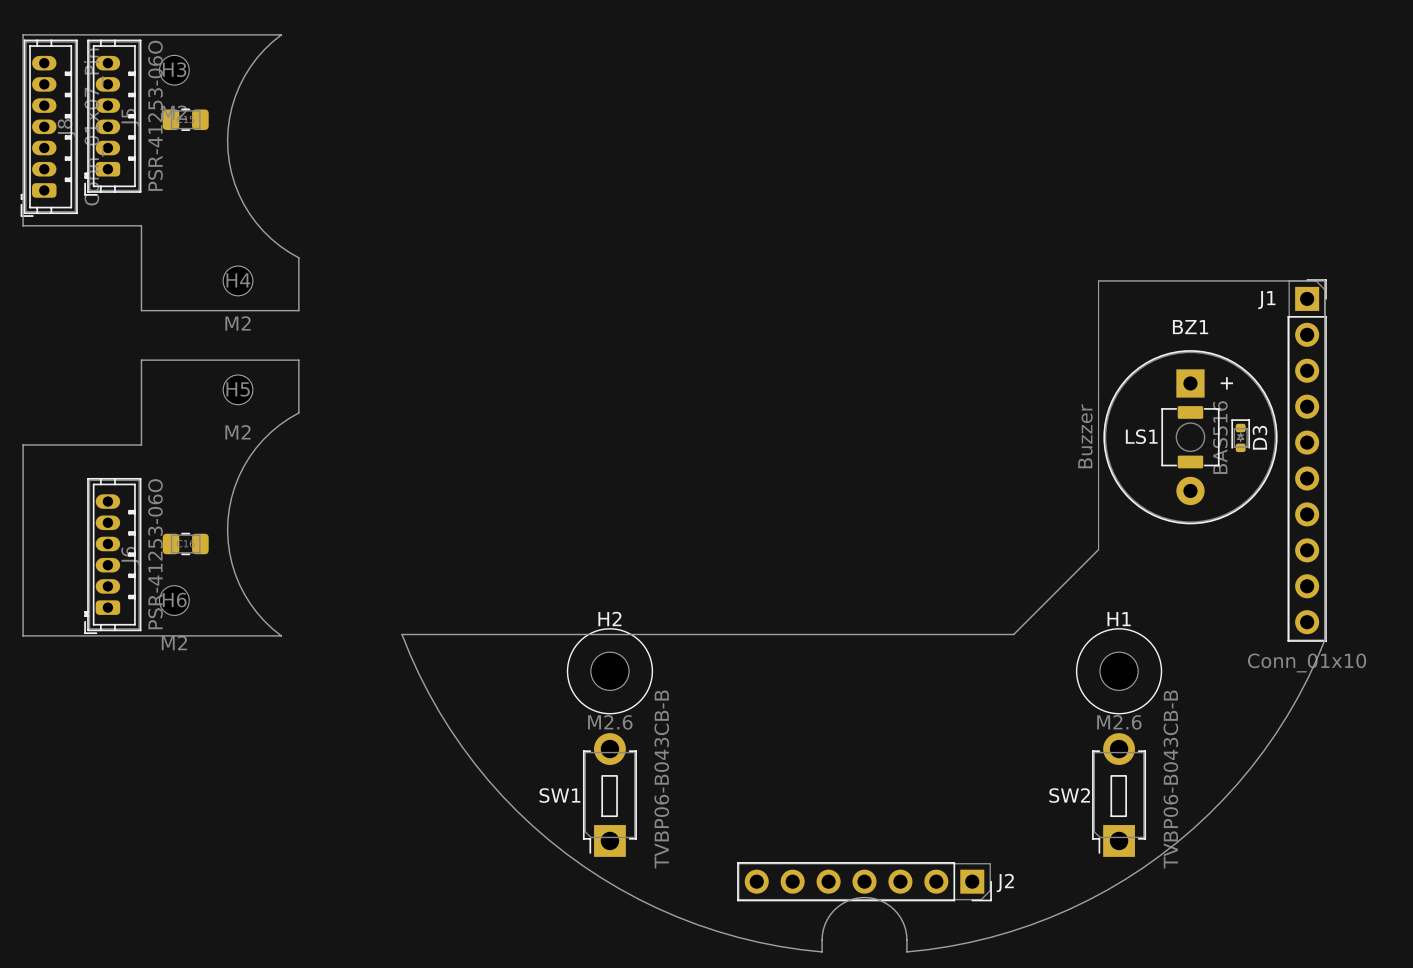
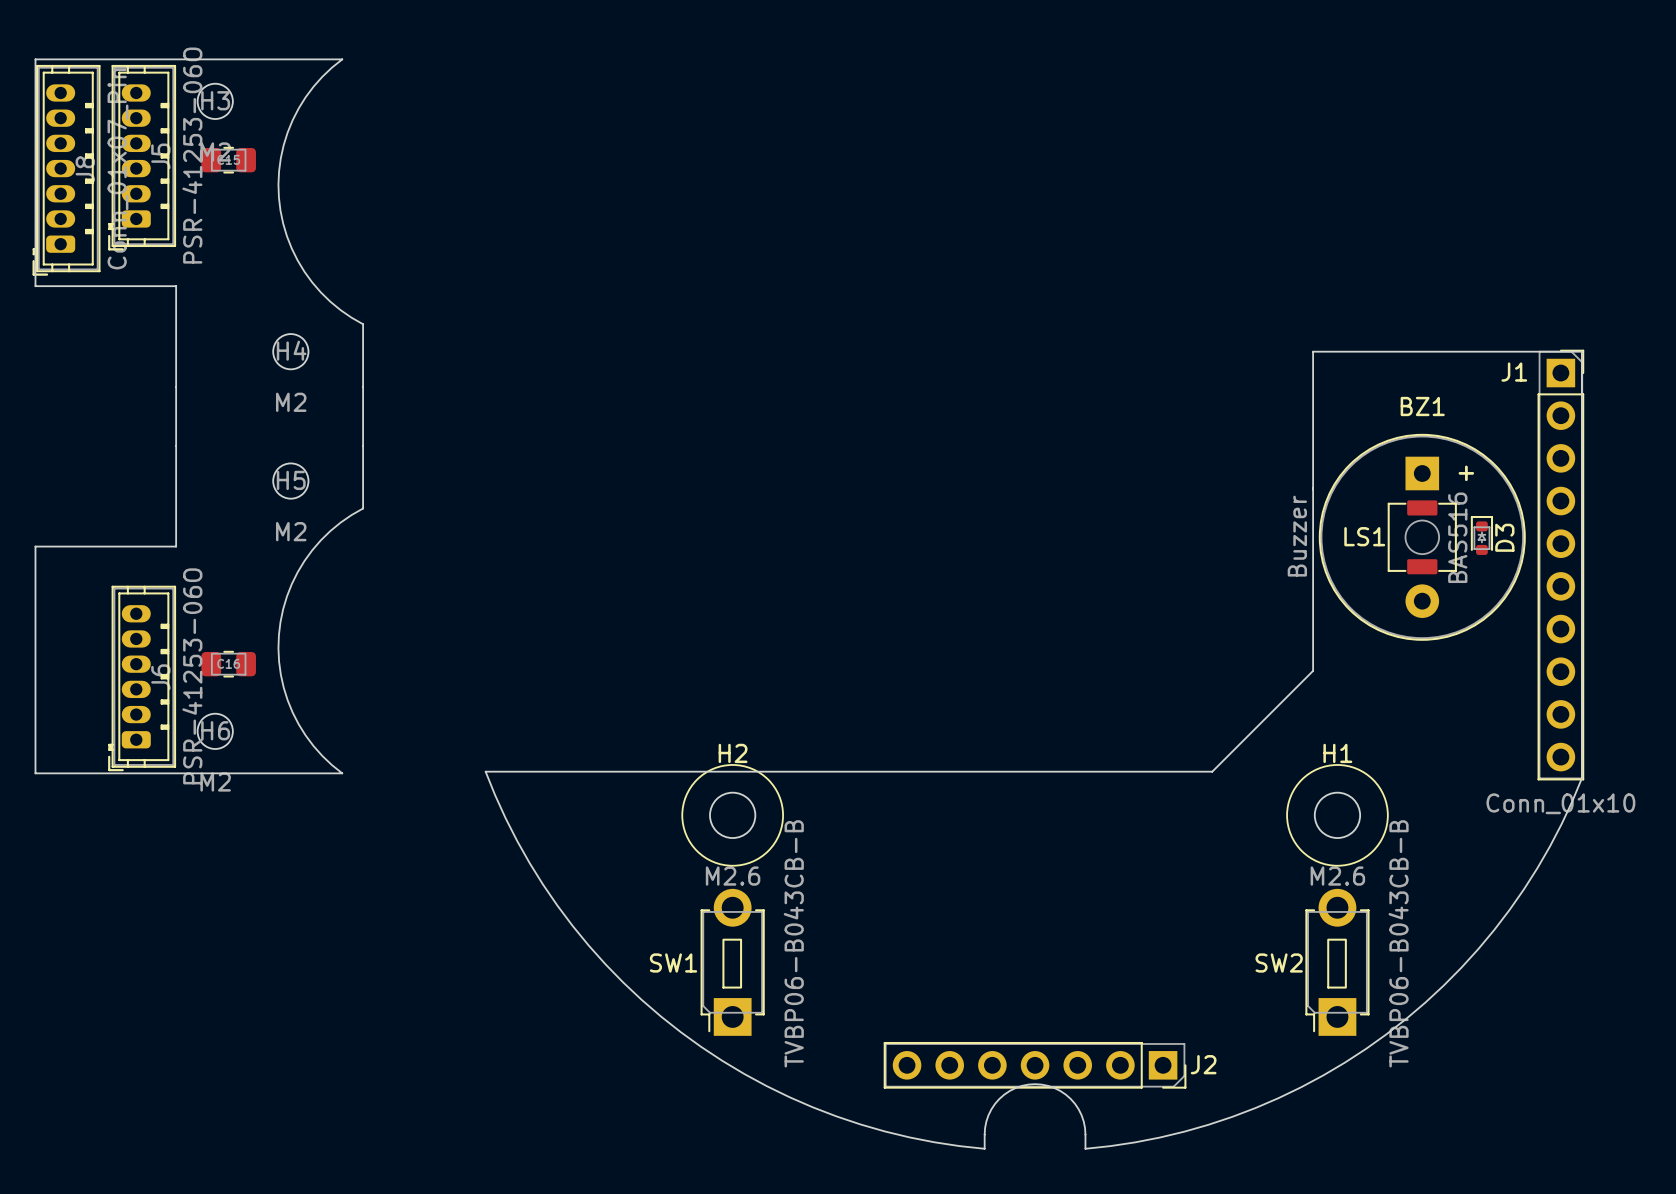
board edge: (141, 310) (298, 310) -> (176, 386) (176, 445)
board edge: (141, 360) (298, 360) -> (363, 386) (363, 445)

